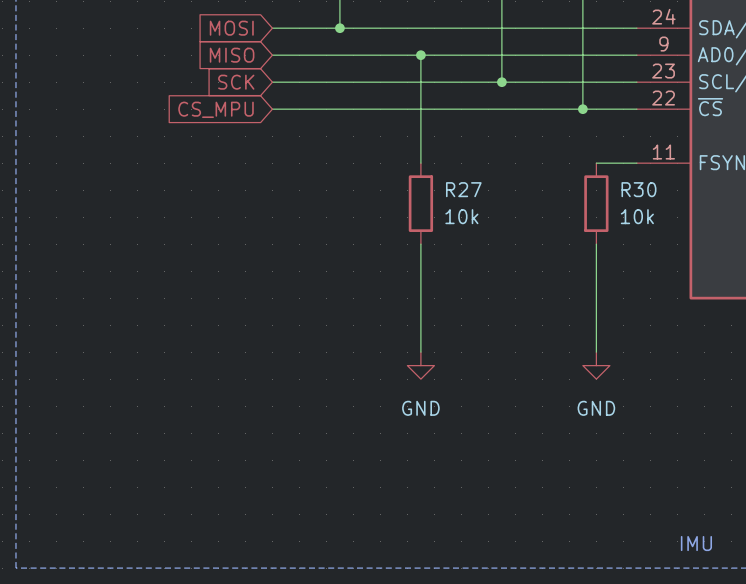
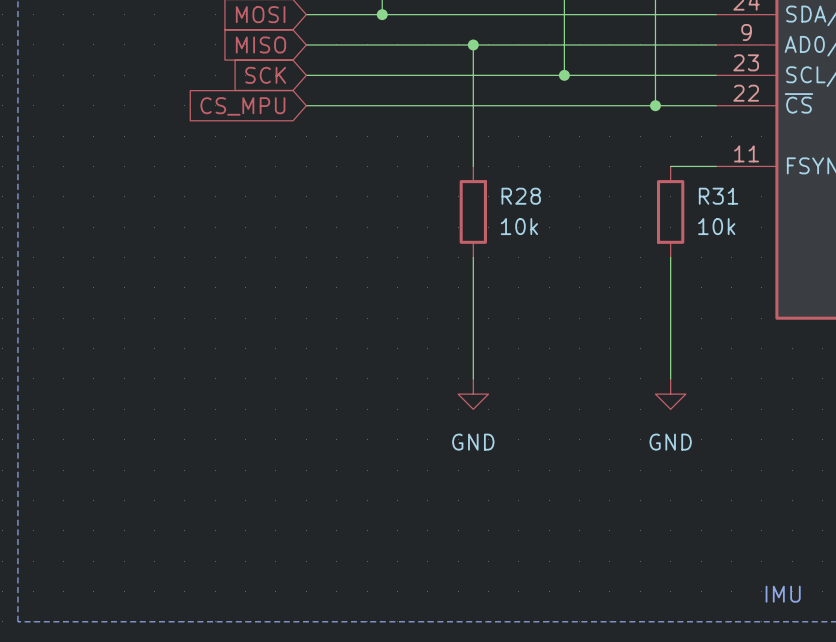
R27 name: R27 (463, 189) -> R28 (521, 196)
R30 name: R30 (638, 189) -> R31 (718, 196)

